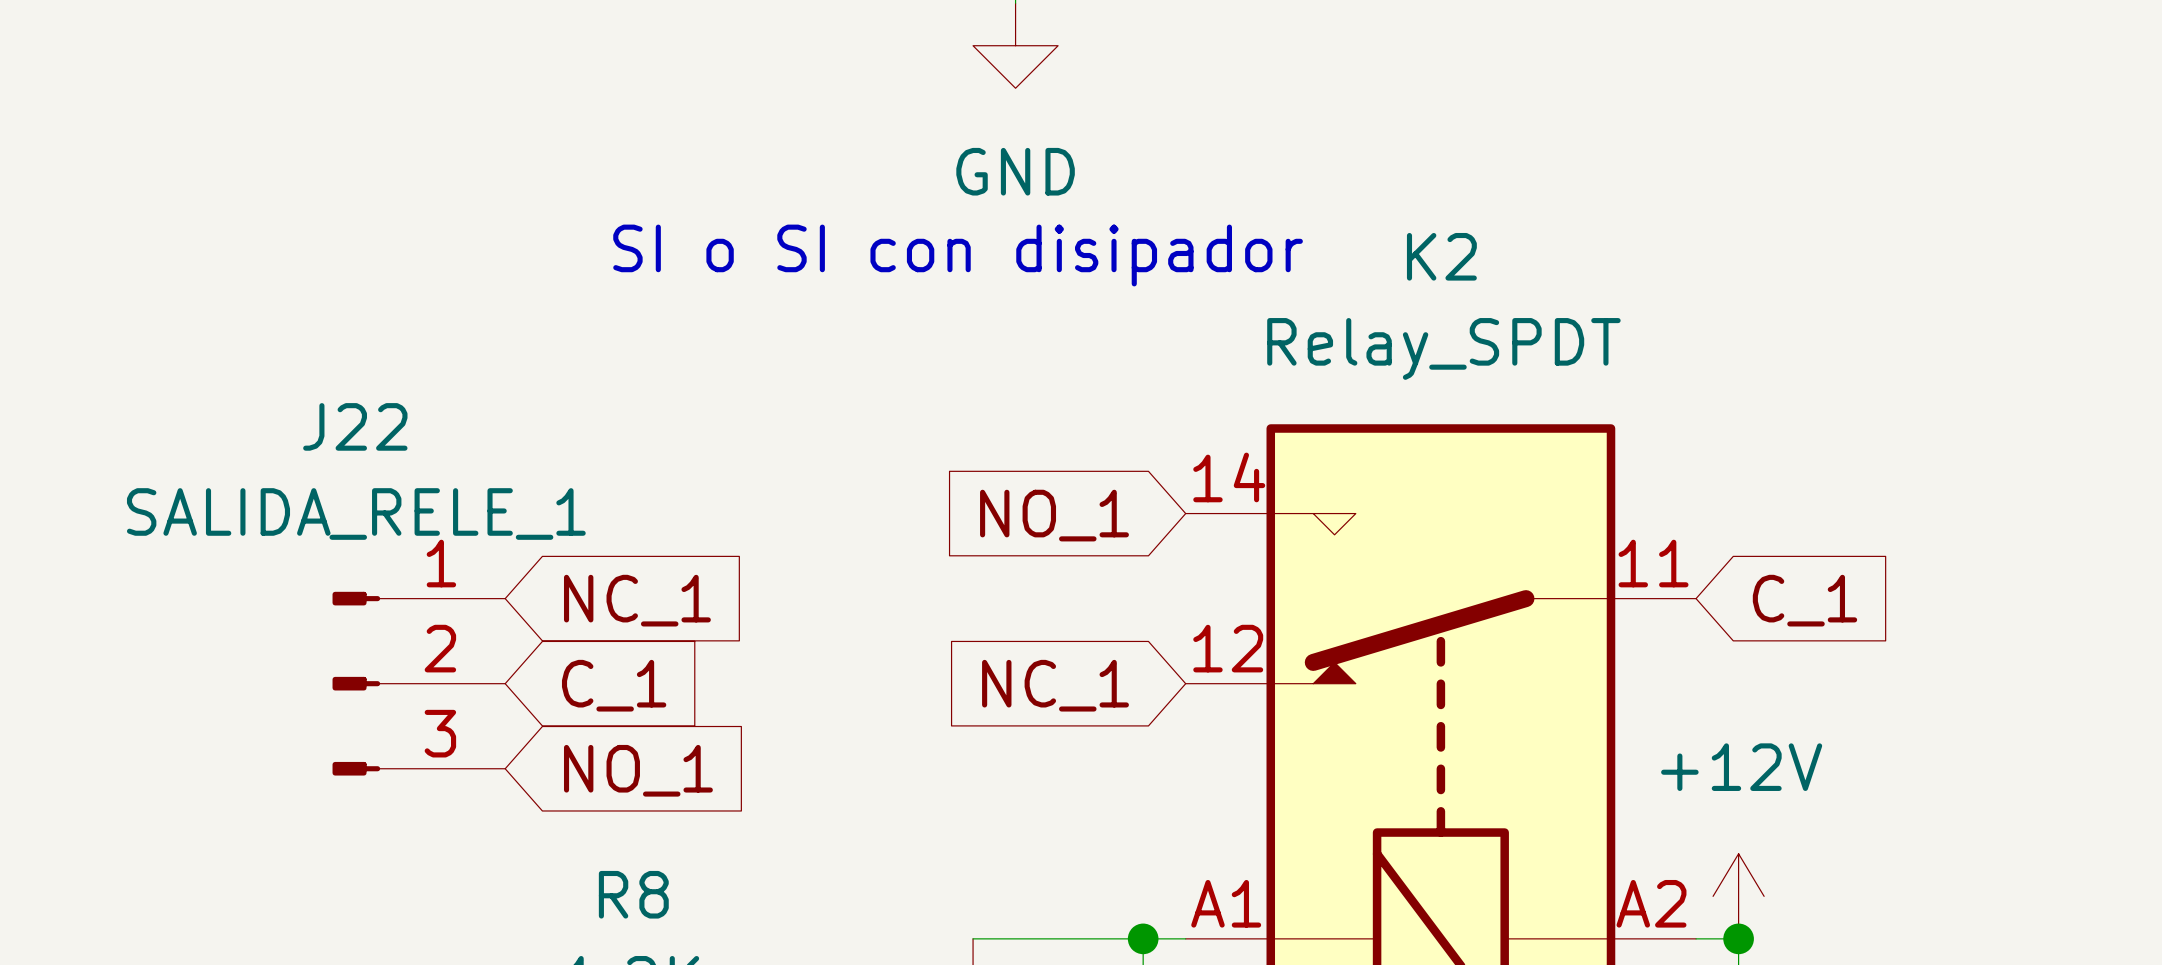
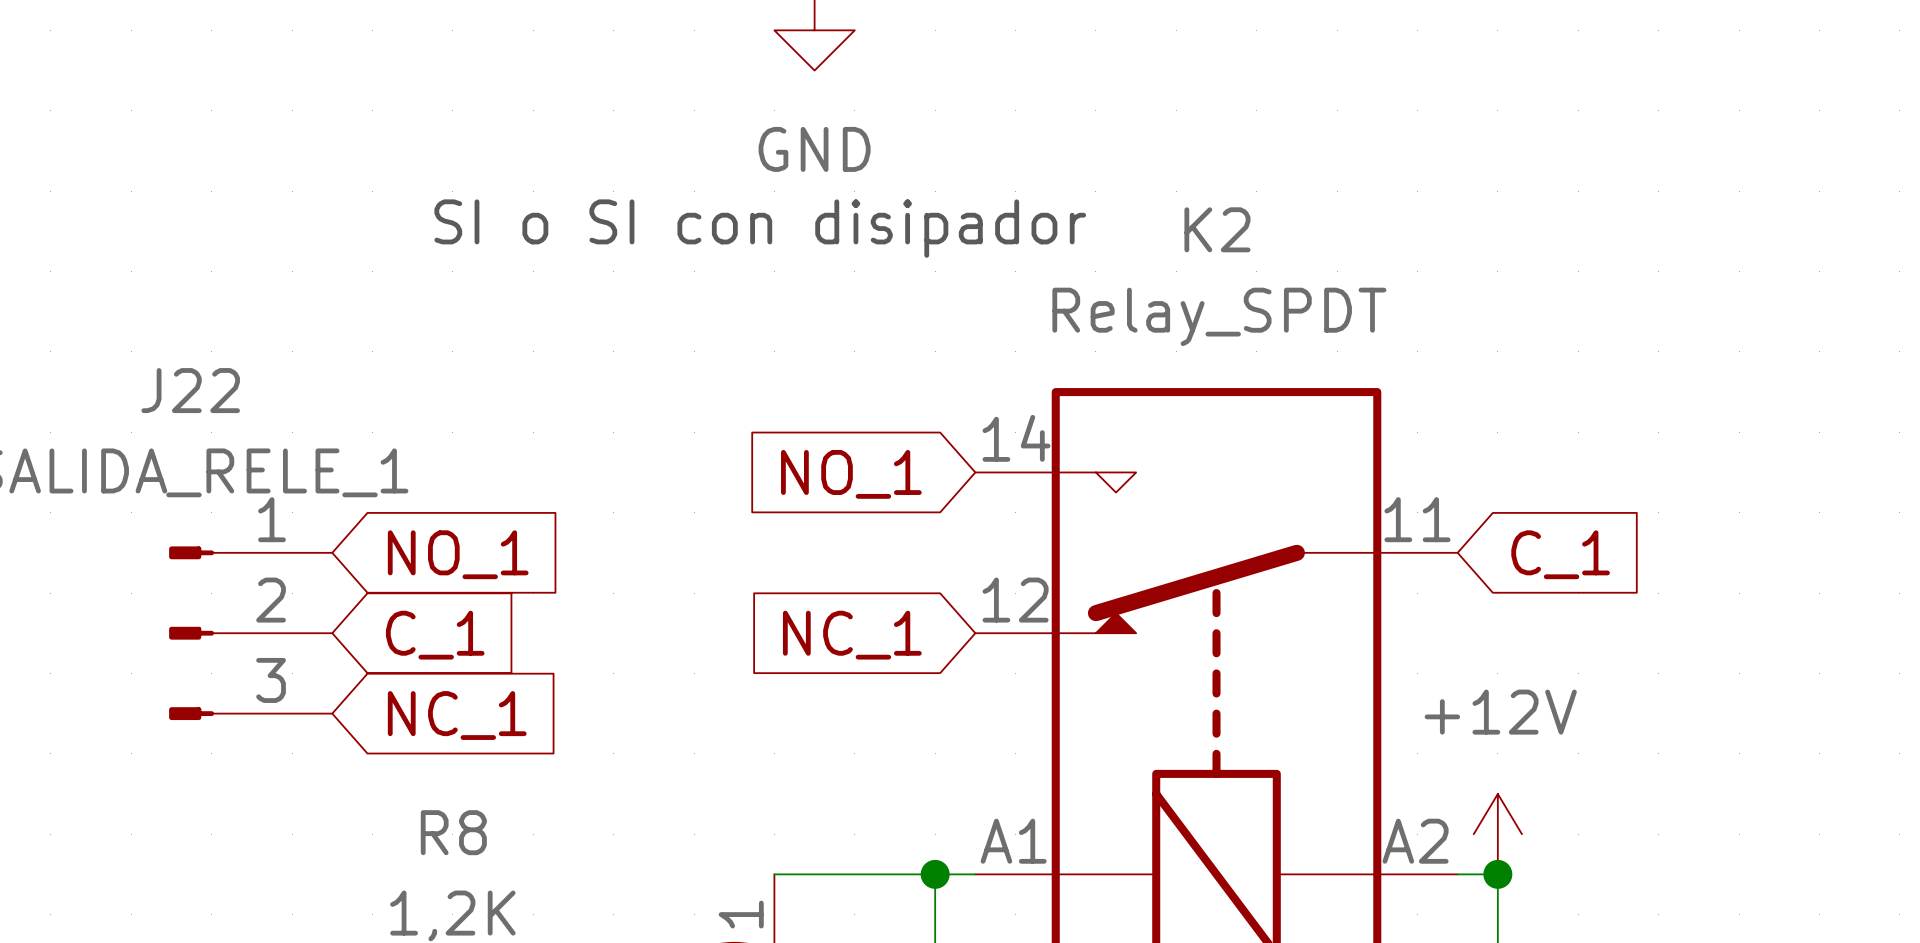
global label: NC_1 (637, 600) -> NO_1 (458, 554)
global label: NO_1 (638, 770) -> NC_1 (457, 715)

